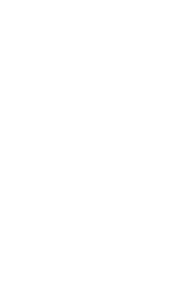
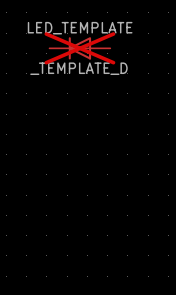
_TEMPLATE_D: none -> LED_TEMPLATE (79, 48)

